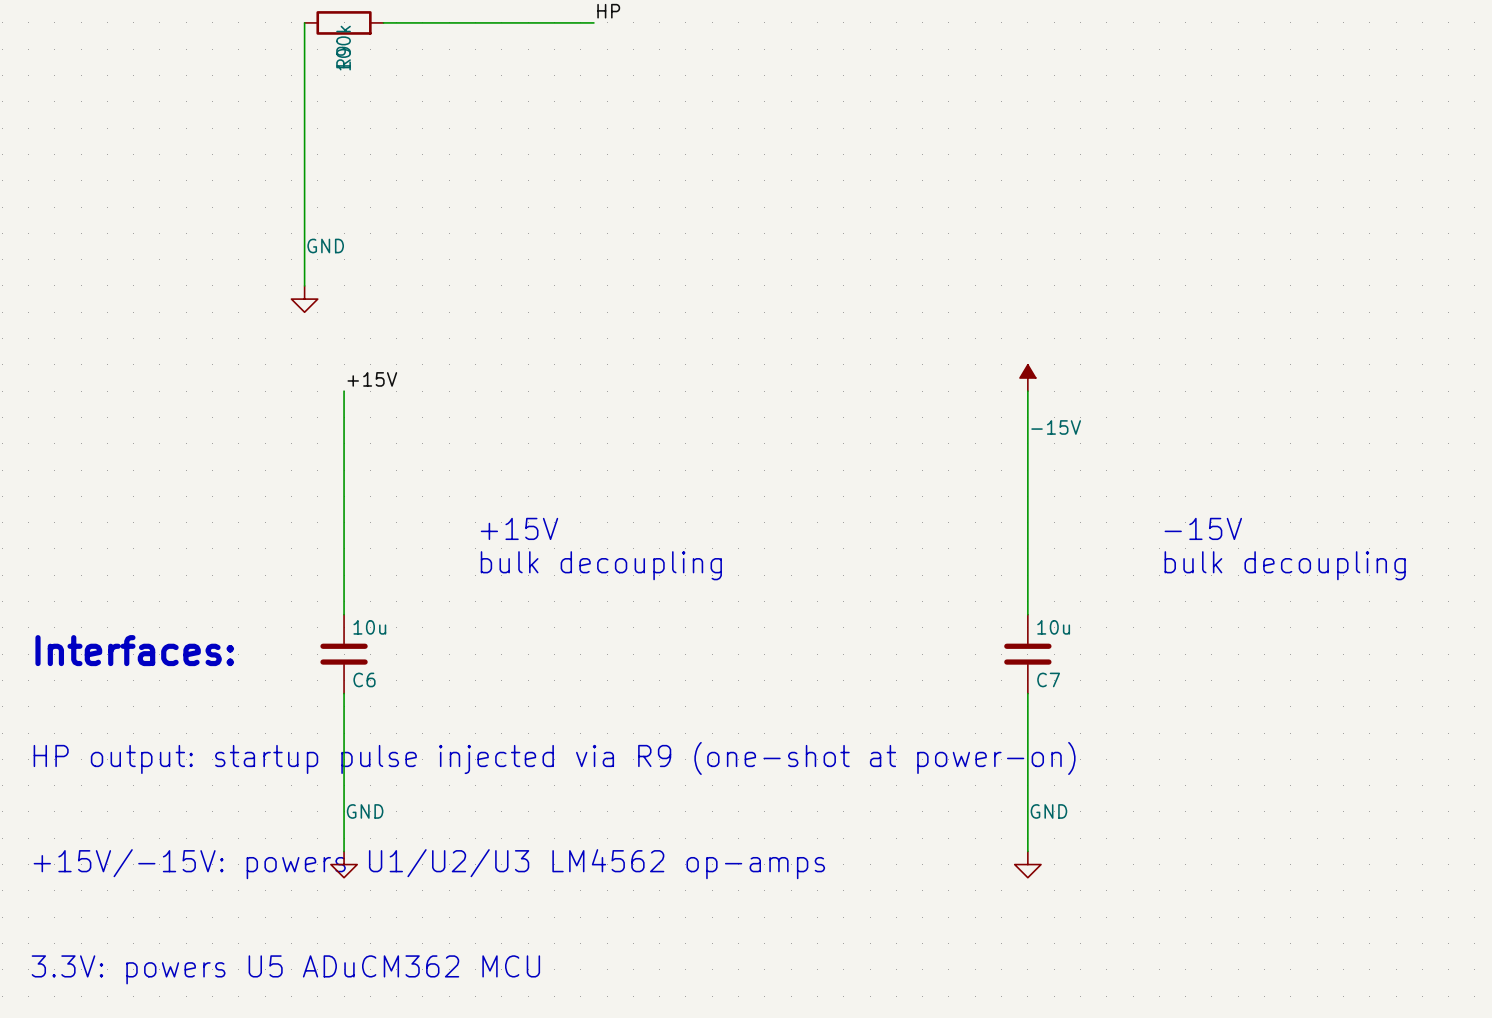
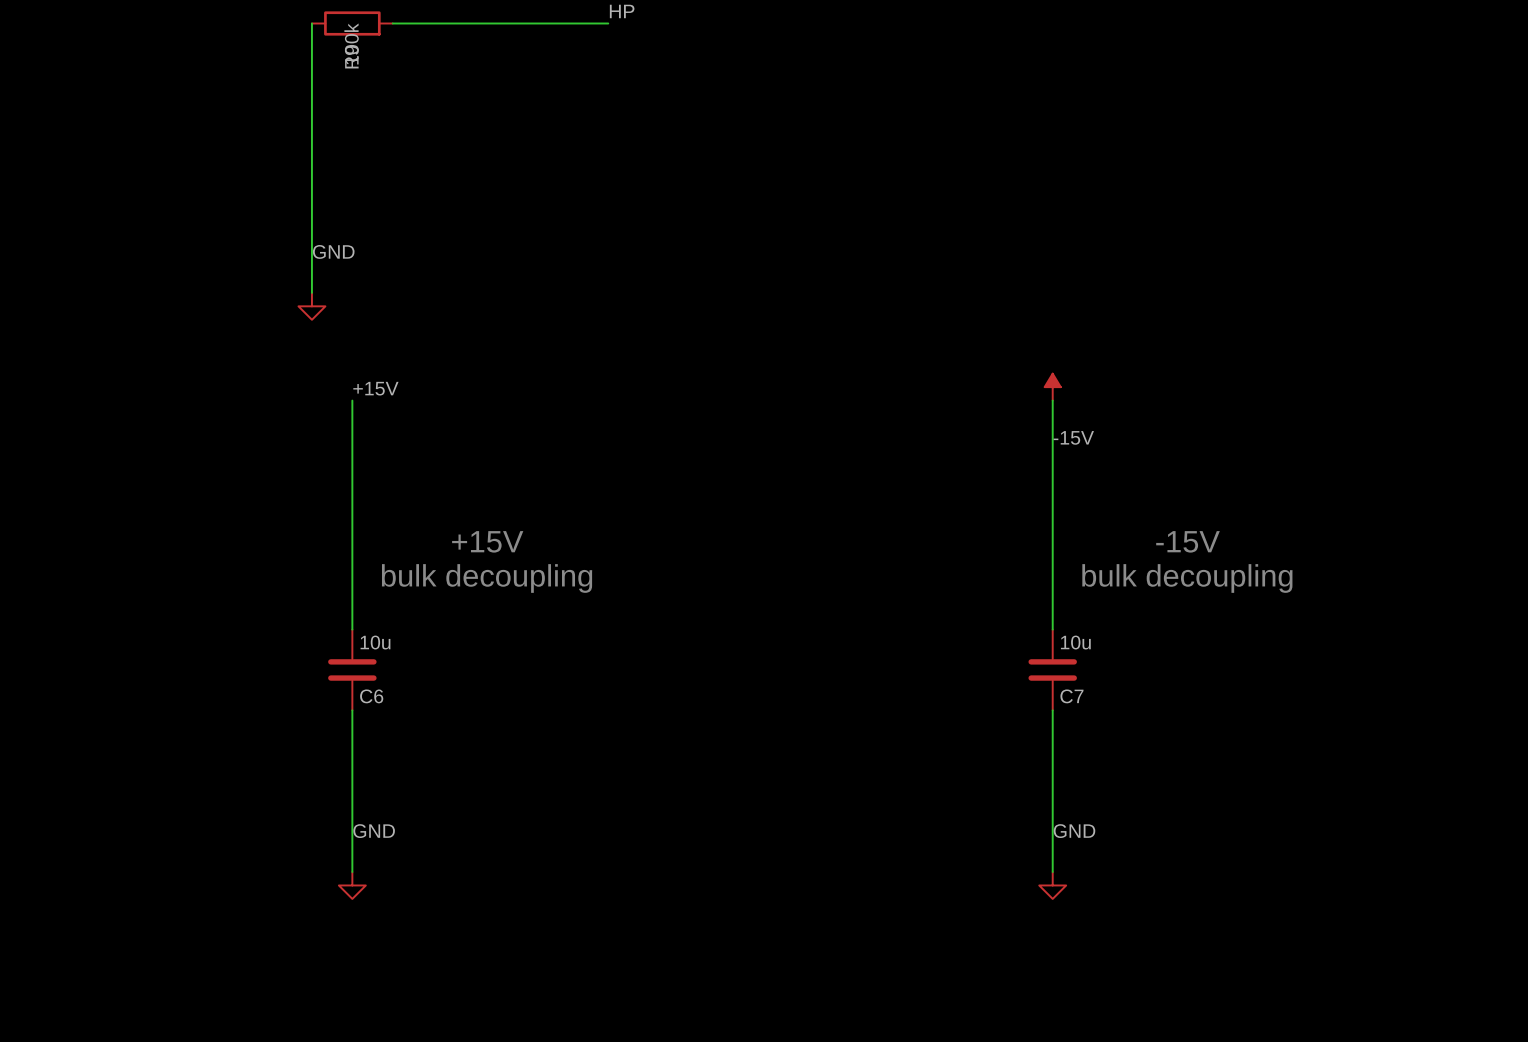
text position: +15V (519, 528) -> +15V (487, 541)
text position: -15V (1203, 528) -> -15V (1188, 541)
text position: bulk decoupling (601, 565) -> bulk decoupling (487, 578)
text position: bulk decoupling (1285, 565) -> bulk decoupling (1187, 578)
text: Interfaces: (134, 650) -> none
text: HP output: startup pulse injected via R9 (one-shot at power-on) (554, 758) -> none
text: +15V/-15V: powers U1/U2/U3 LM4562 op-amps (429, 864) -> none
text: 3.3V: powers U5 ADuCM362 MCU (285, 969) -> none

